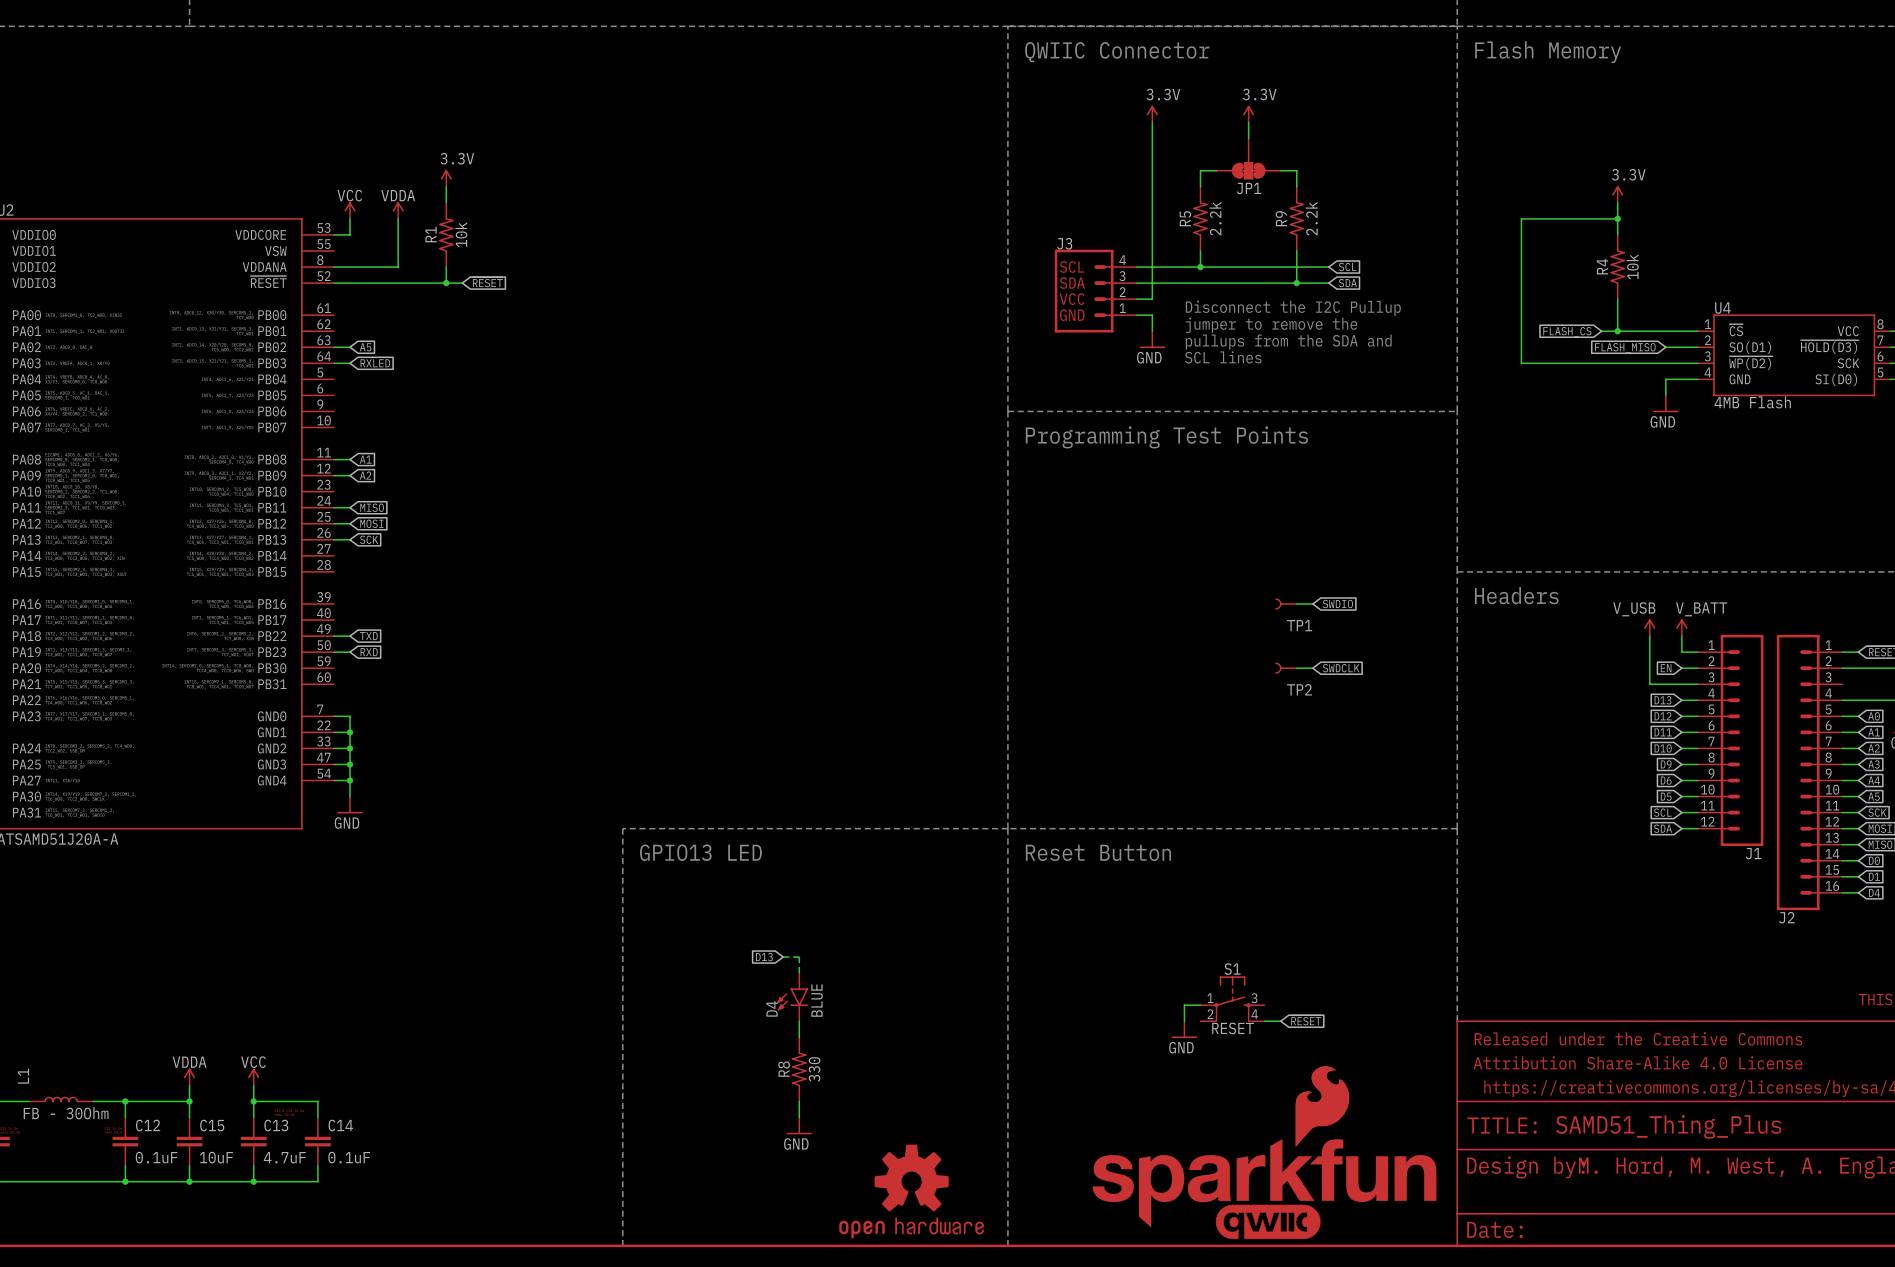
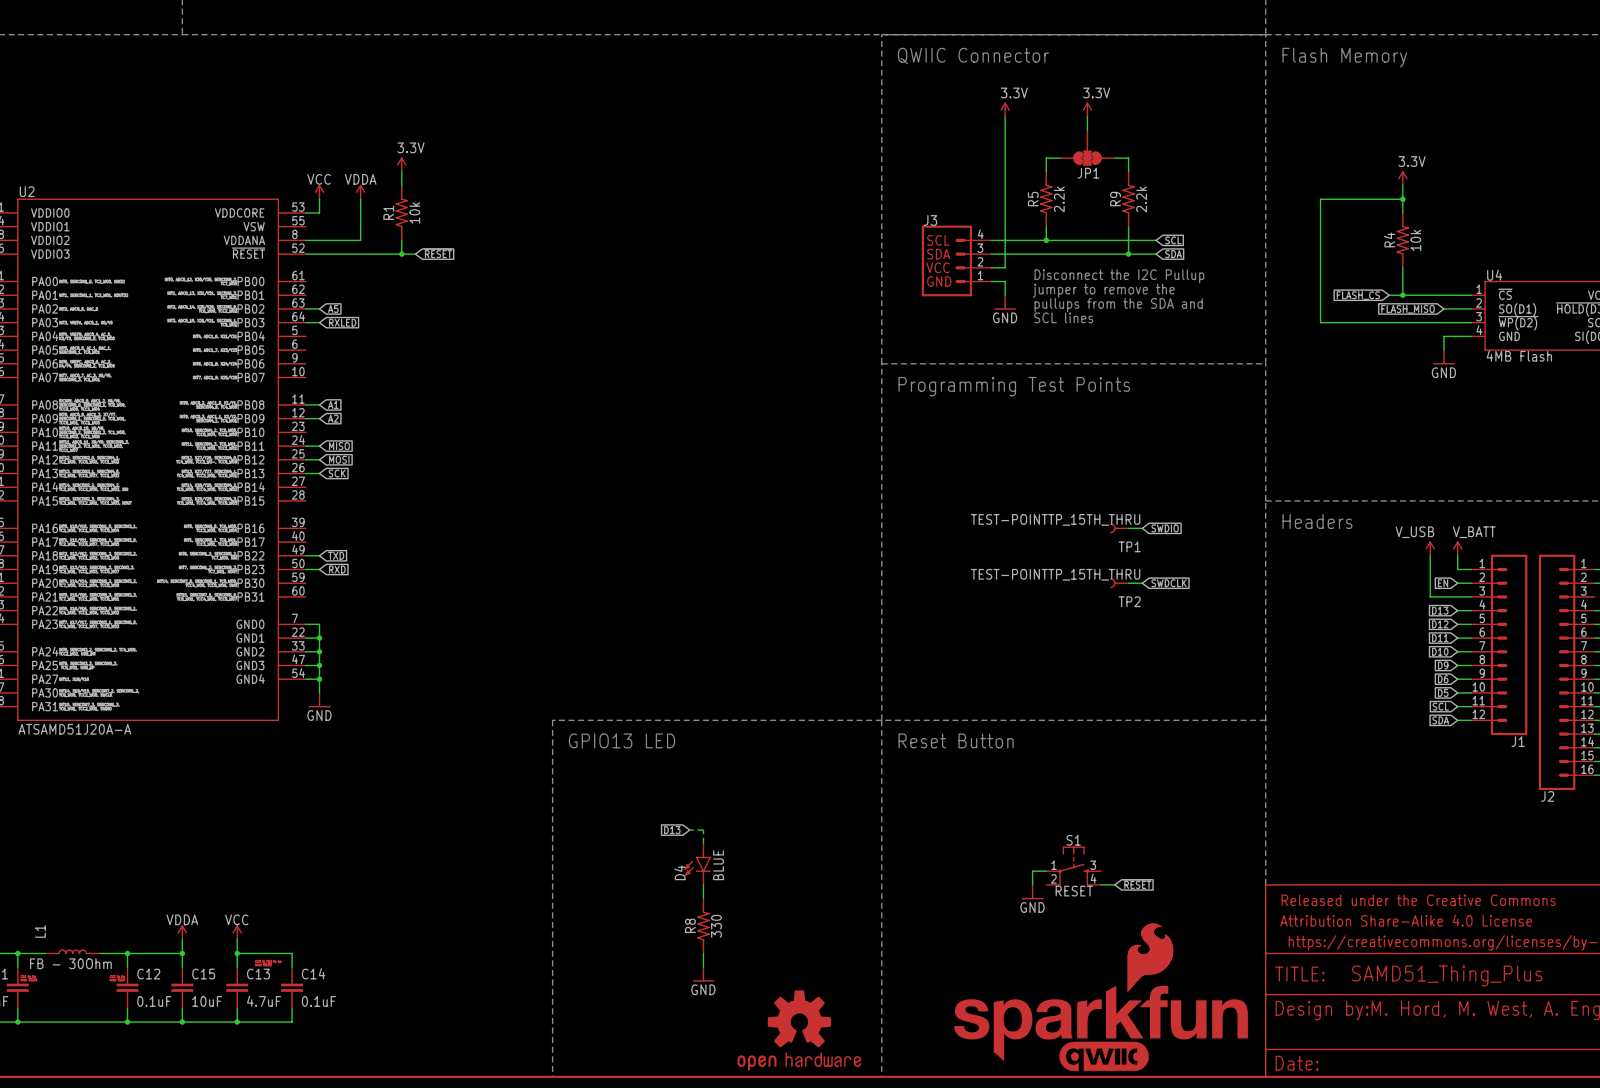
TP1 value: none -> TEST-POINTTP_15TH_THRU (1055, 519)
TP2 value: none -> TEST-POINTTP_15TH_THRU (1055, 574)

